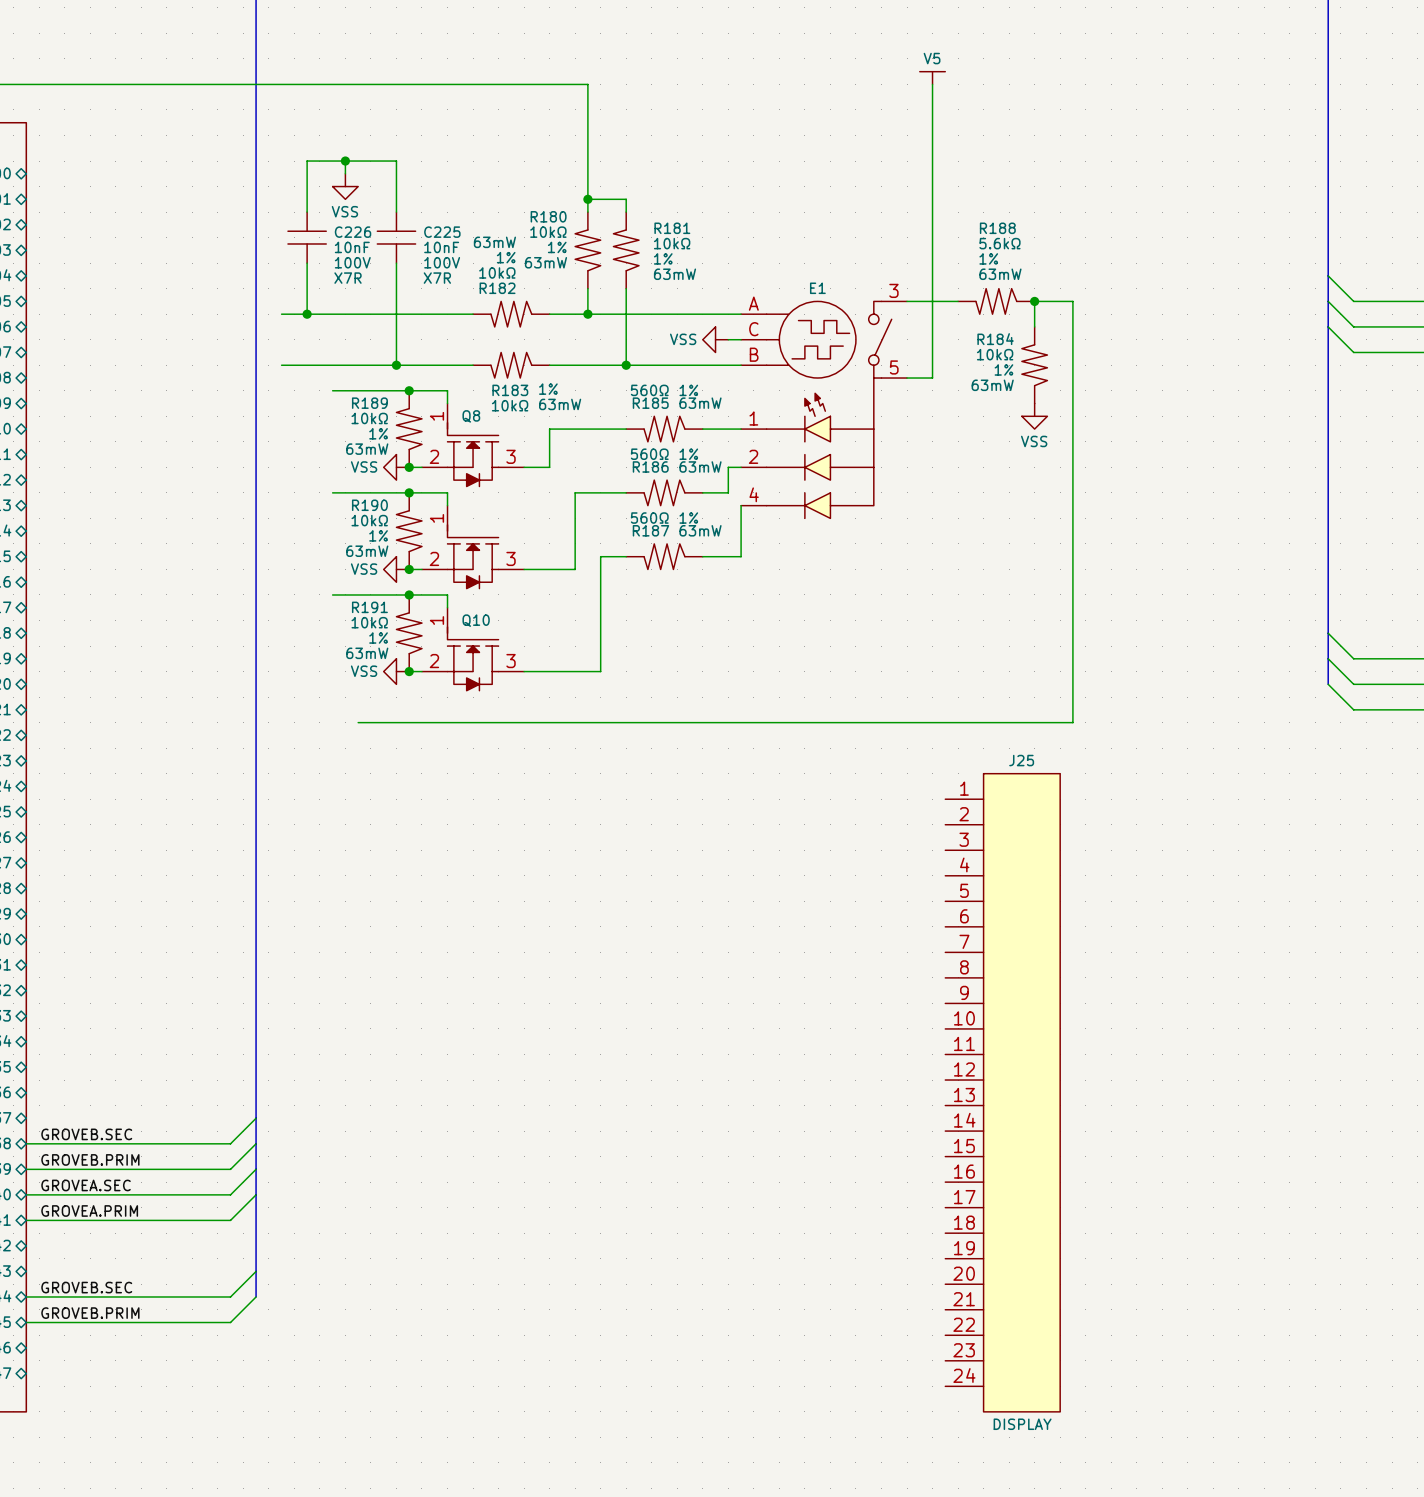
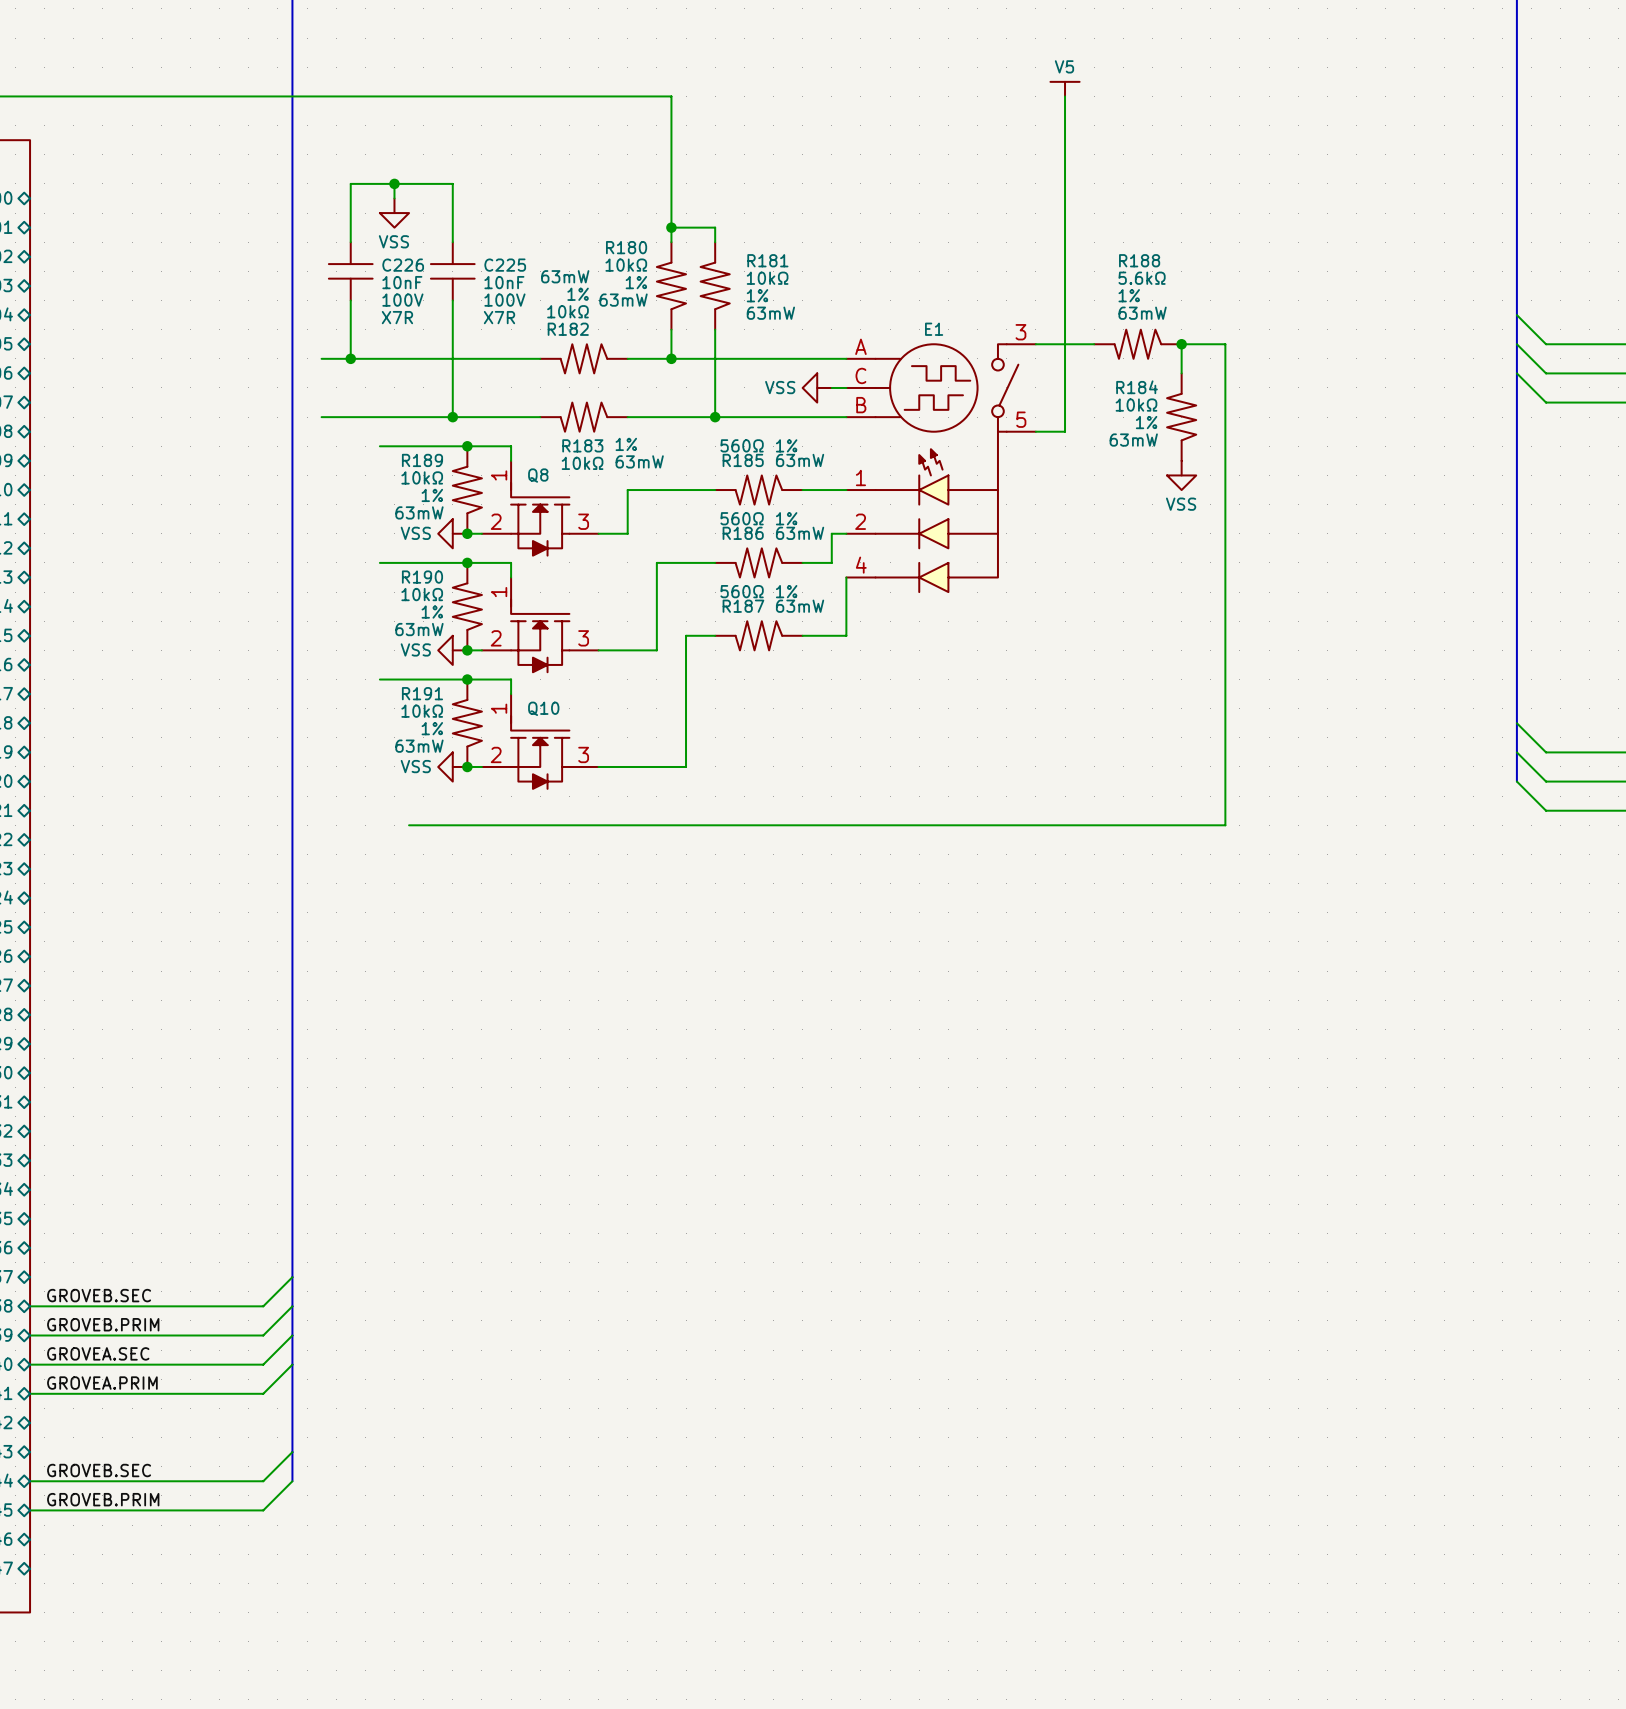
J25: DISPLAY (1002, 1092) -> none

